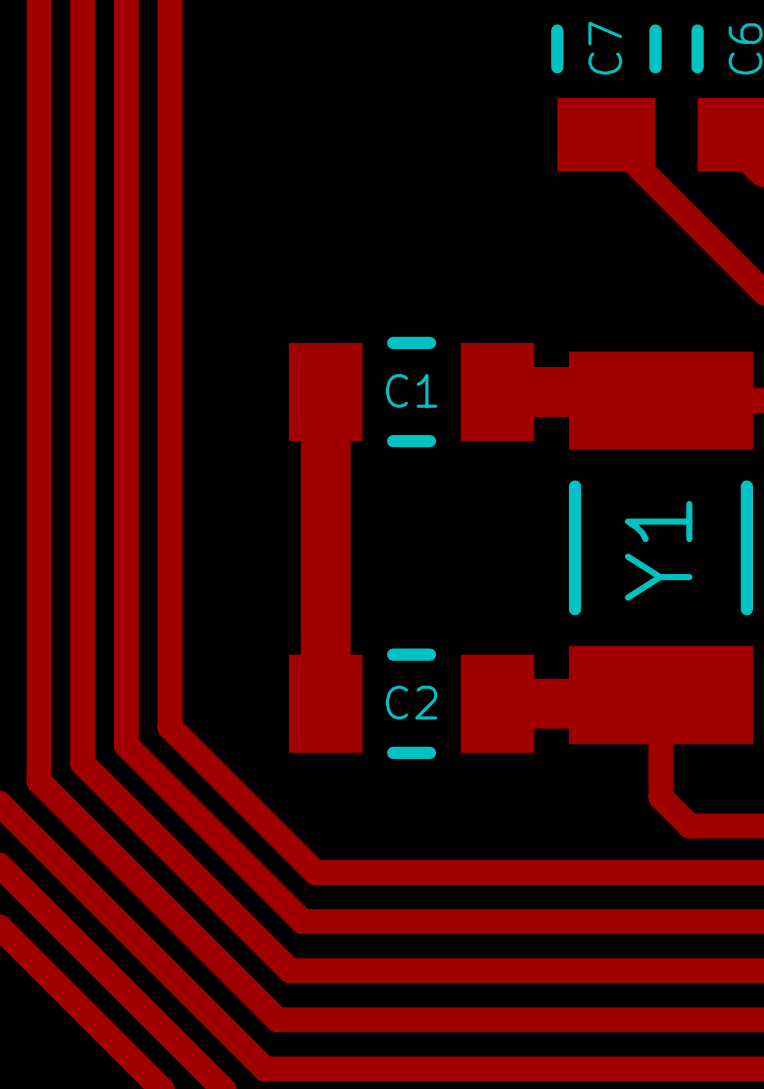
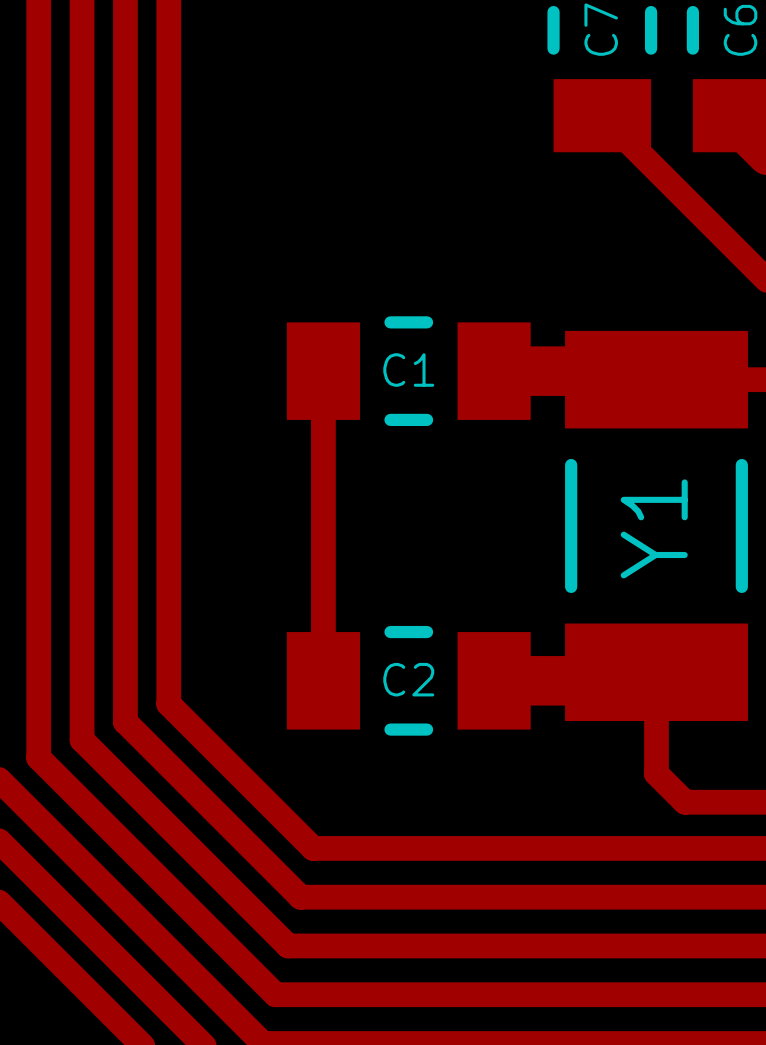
track width: thick (325, 392) (325, 703) -> thin (323, 371) (323, 680)

